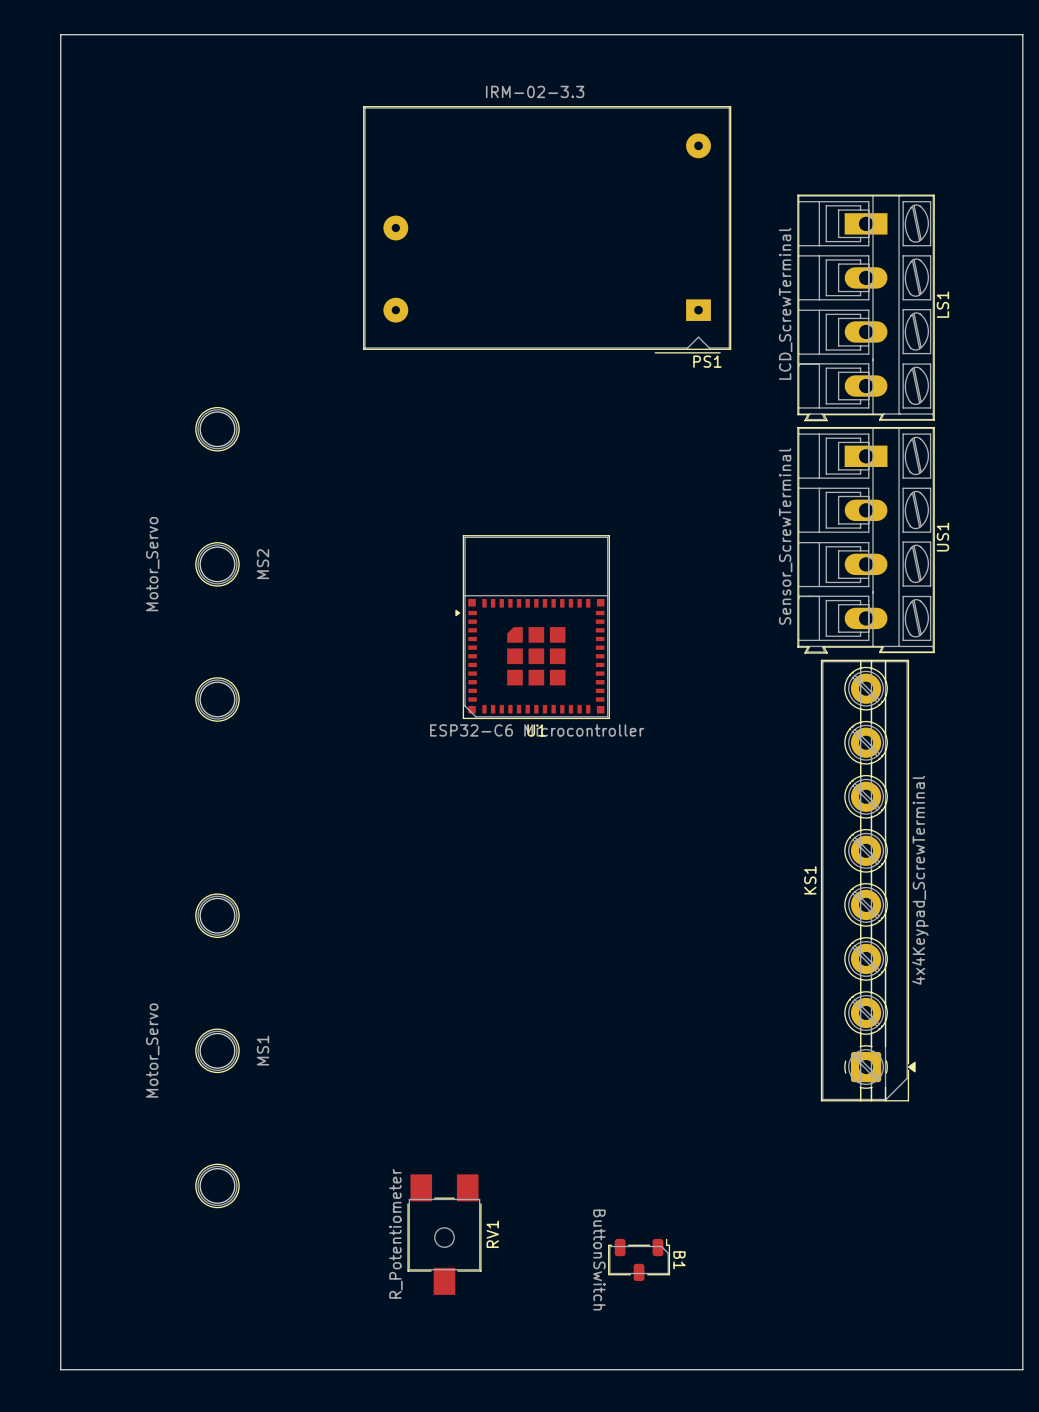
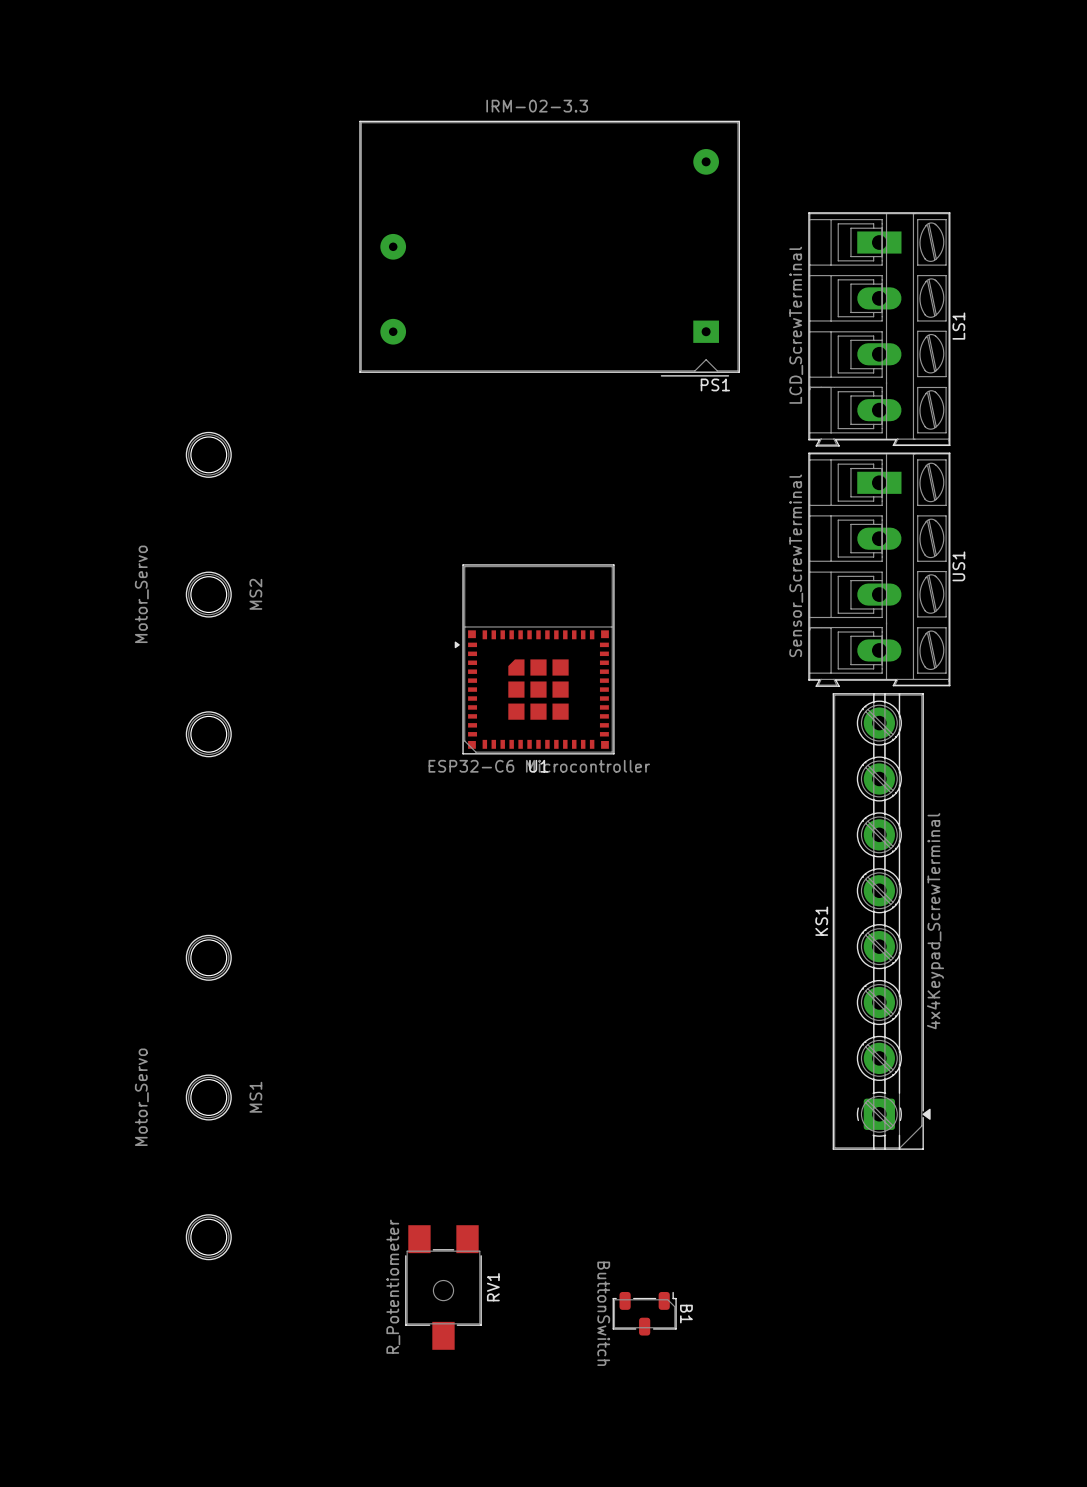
board edge: (60, 34) (1022, 34) (1022, 1369) (60, 1369) (60, 34) -> none

